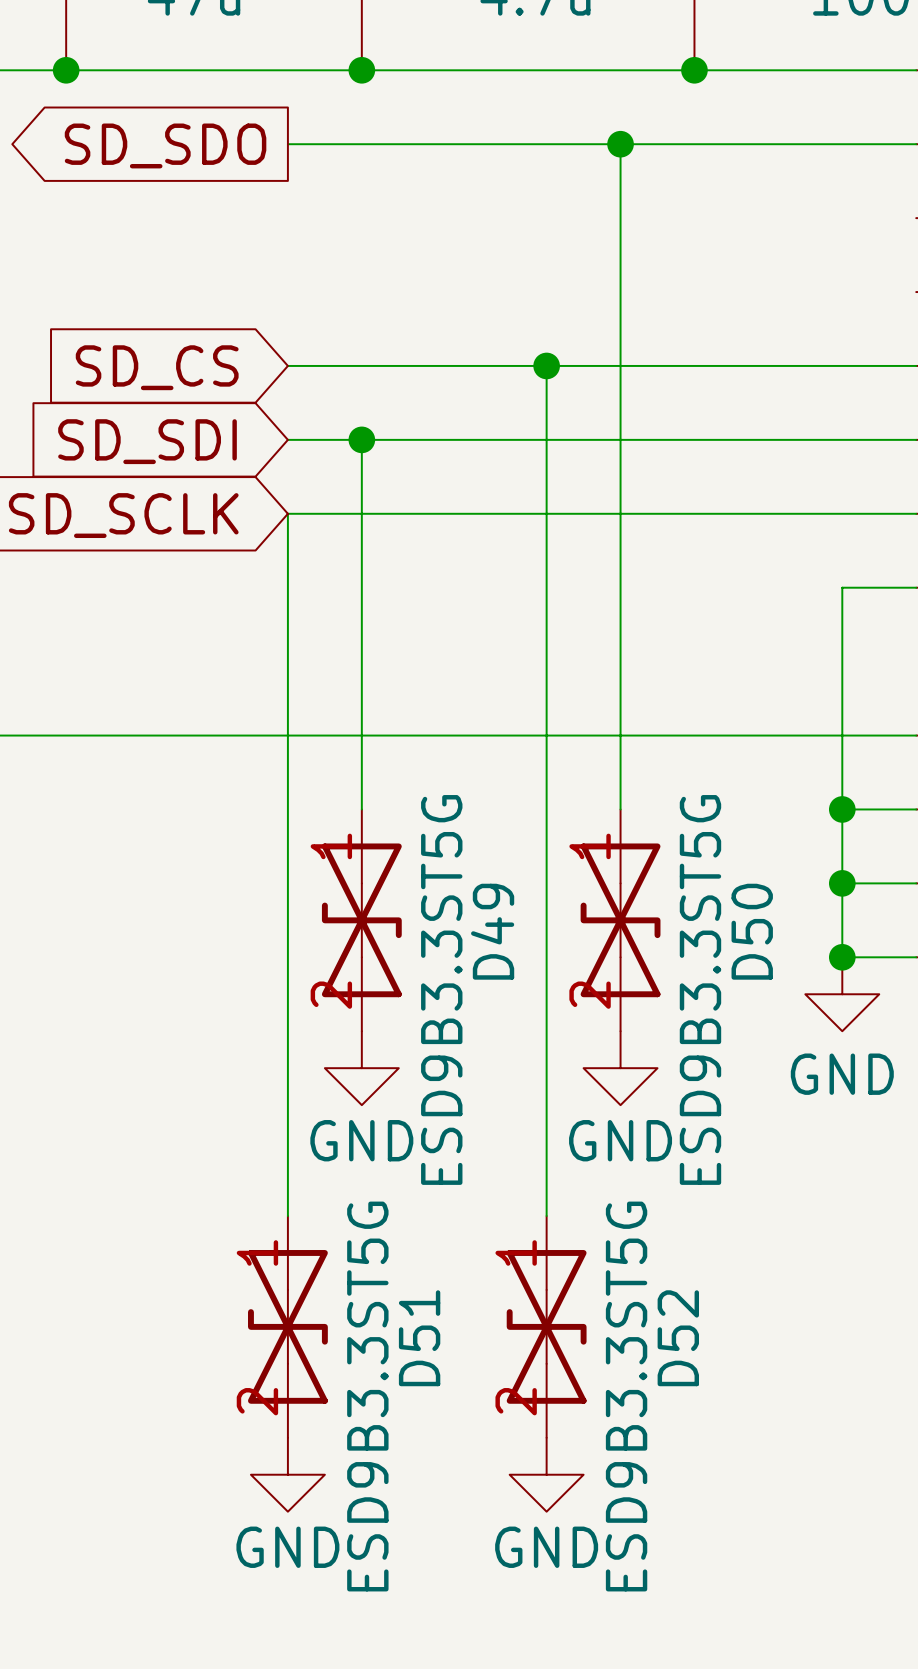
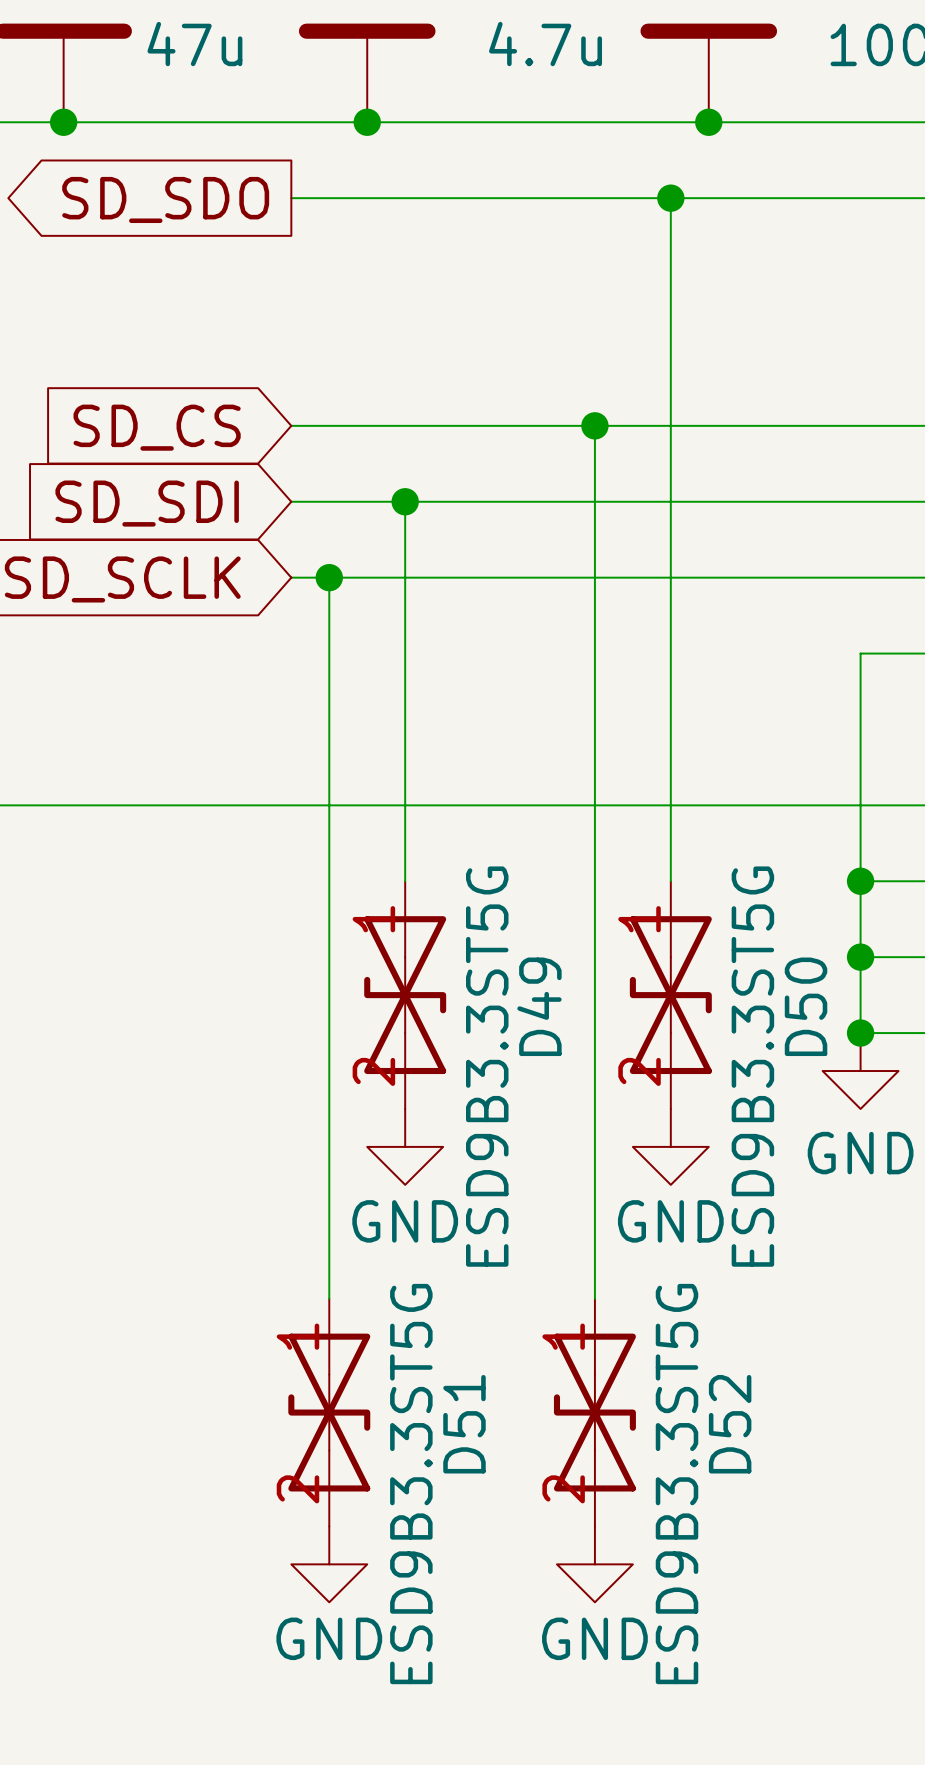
wire: (620, 144) (620, 809) -> (670, 198) (670, 881)
junction position: (620, 144) -> (670, 198)
wire: (546, 365) (546, 1216) -> (594, 425) (594, 1298)
junction position: (546, 365) -> (594, 425)
wire: (361, 439) (361, 809) -> (405, 501) (405, 881)
junction position: (361, 439) -> (405, 501)
wire: (287, 513) (287, 1216) -> (329, 577) (329, 1298)
junction: none -> (329, 577)
D49 position: (361, 920) -> (405, 995)
D50 position: (620, 920) -> (670, 995)
power symbol position: GND (361, 1068) -> GND (405, 1146)
power symbol position: GND (620, 1068) -> GND (670, 1146)
D51 position: (287, 1326) -> (329, 1412)
D52 position: (546, 1326) -> (594, 1412)
power symbol position: GND (287, 1474) -> GND (329, 1564)
power symbol position: GND (546, 1474) -> GND (594, 1564)

